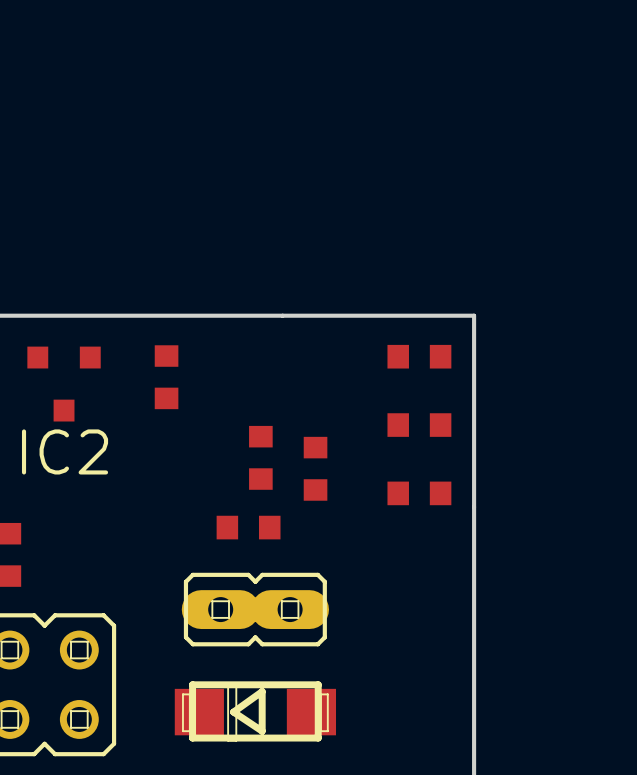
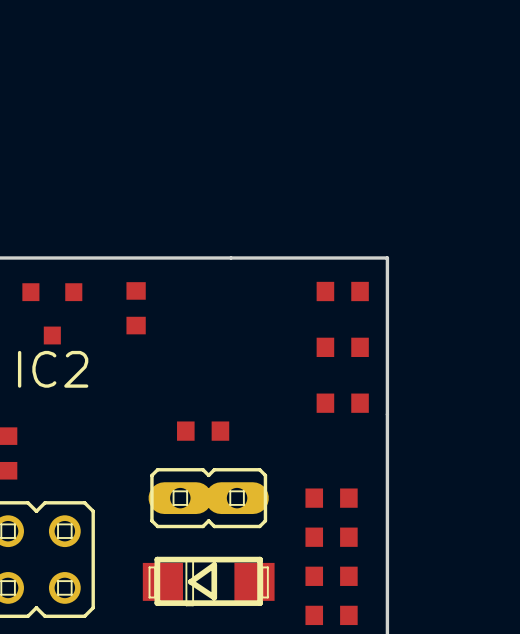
part: (260, 457) -> none
part: (315, 468) -> none
part: none -> (331, 498)
part: none -> (331, 537)
part: none -> (331, 576)
part: none -> (331, 615)

